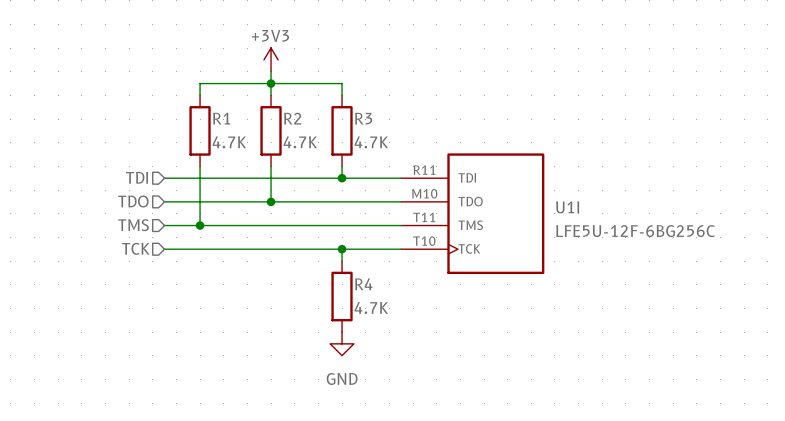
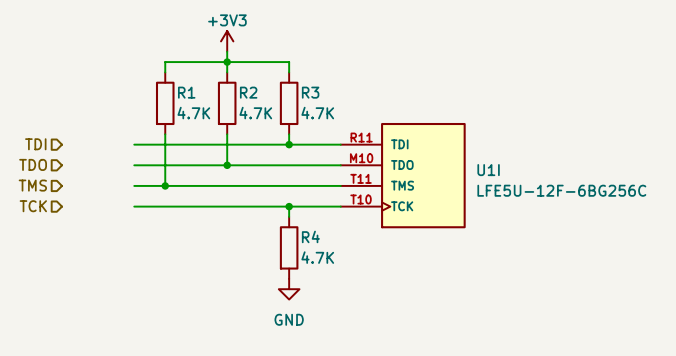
hierarchical label position: TDI (136, 177) -> TDI (35, 144)
hierarchical label position: TDO (133, 201) -> TDO (33, 164)
hierarchical label position: TMS (133, 225) -> TMS (32, 185)
hierarchical label position: TCK (135, 248) -> TCK (33, 206)

